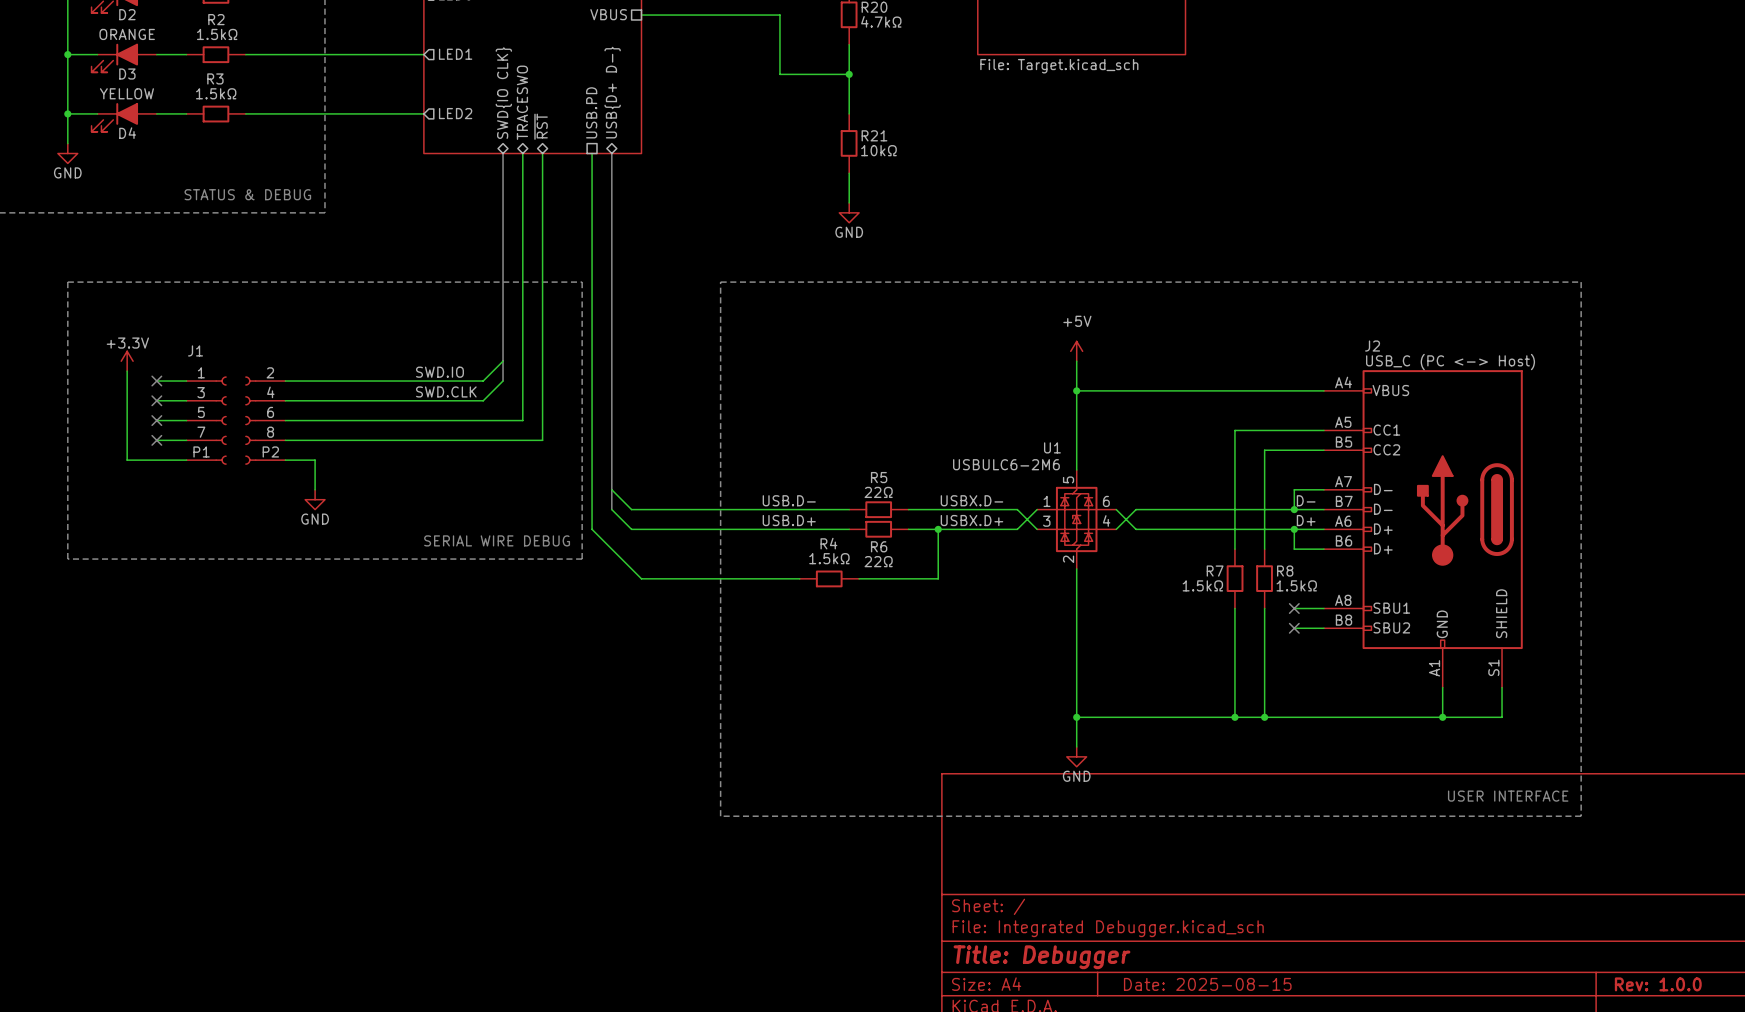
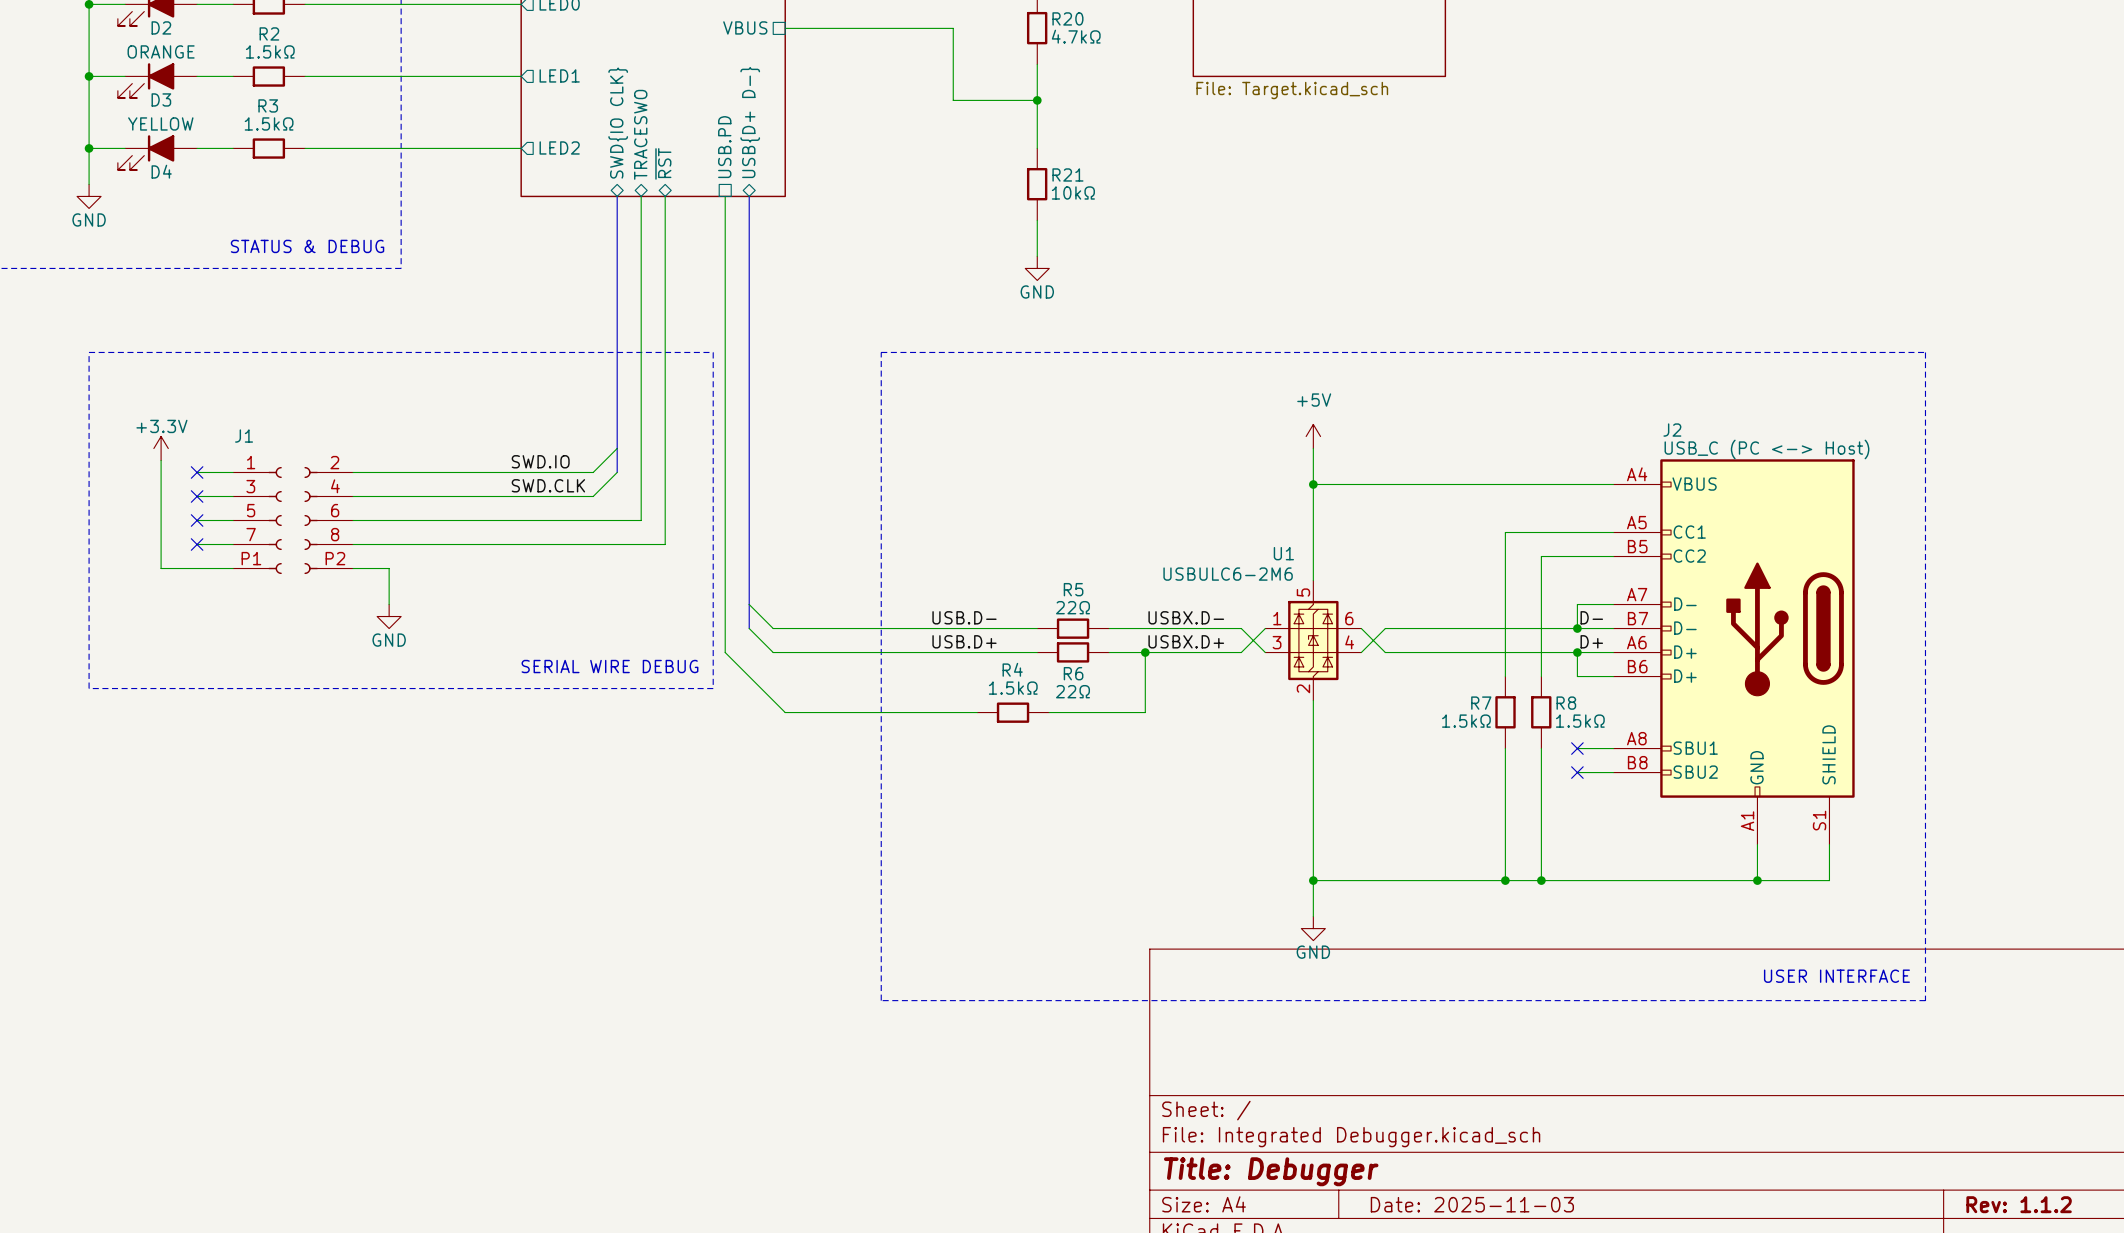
title block: Date: 2025-08-15 (1207, 984) -> Date: 2025-11-03 (1472, 1204)
title block: Rev: 1.0.0 (1658, 984) -> Rev: 1.1.2 (2019, 1204)

